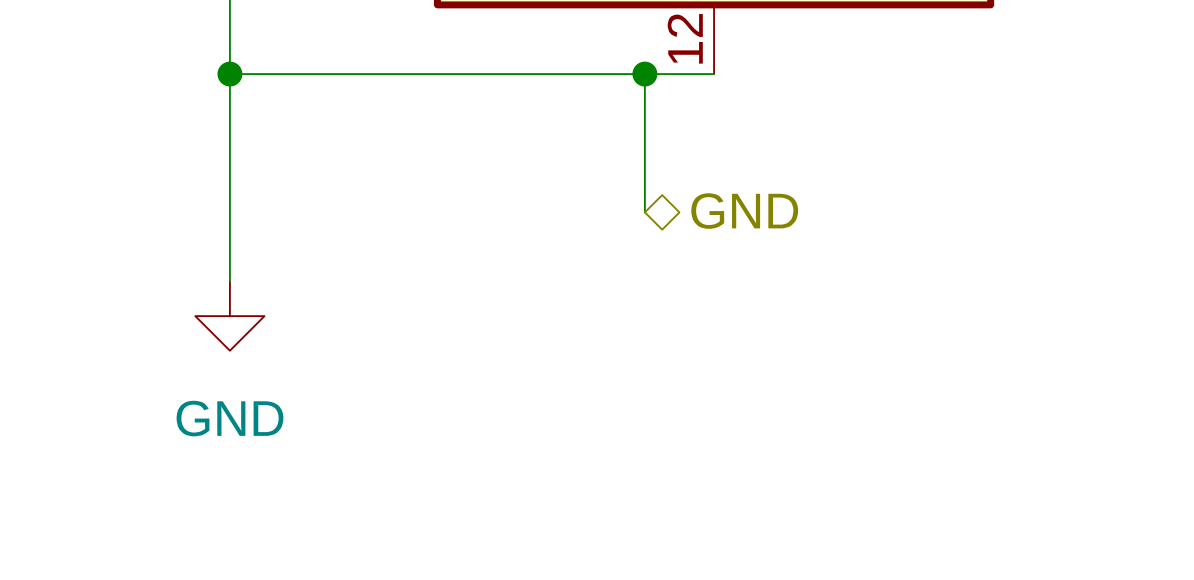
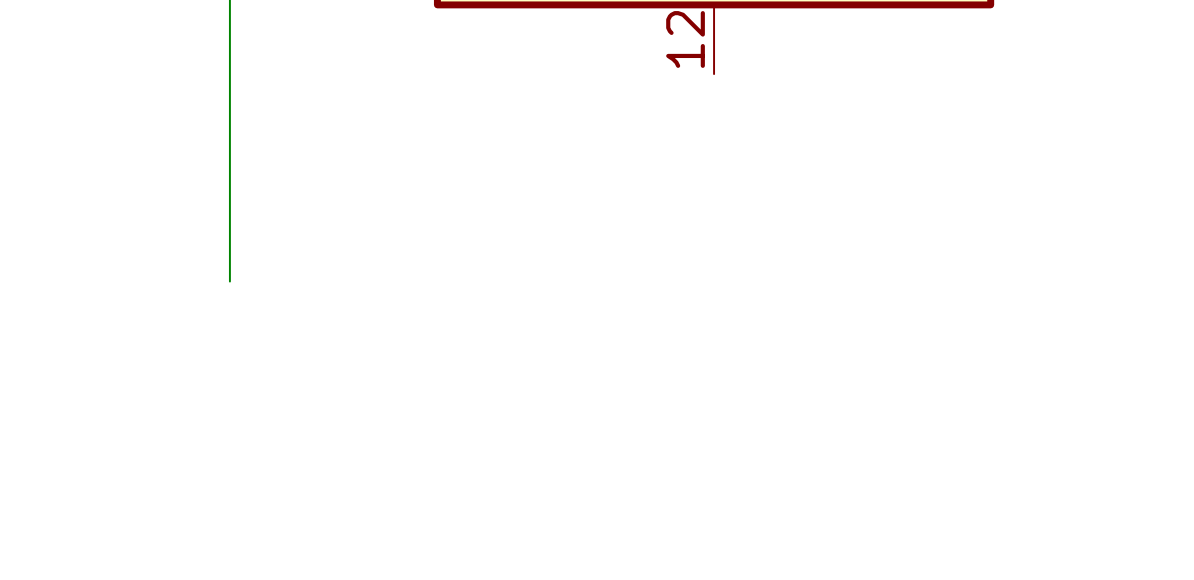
wire: (229, 74) (714, 74) -> none
junction: (229, 74) -> none
wire: (644, 74) (644, 212) -> none
junction: (644, 74) -> none
hierarchical label: GND (744, 211) -> none
power symbol: GND (229, 316) -> none

